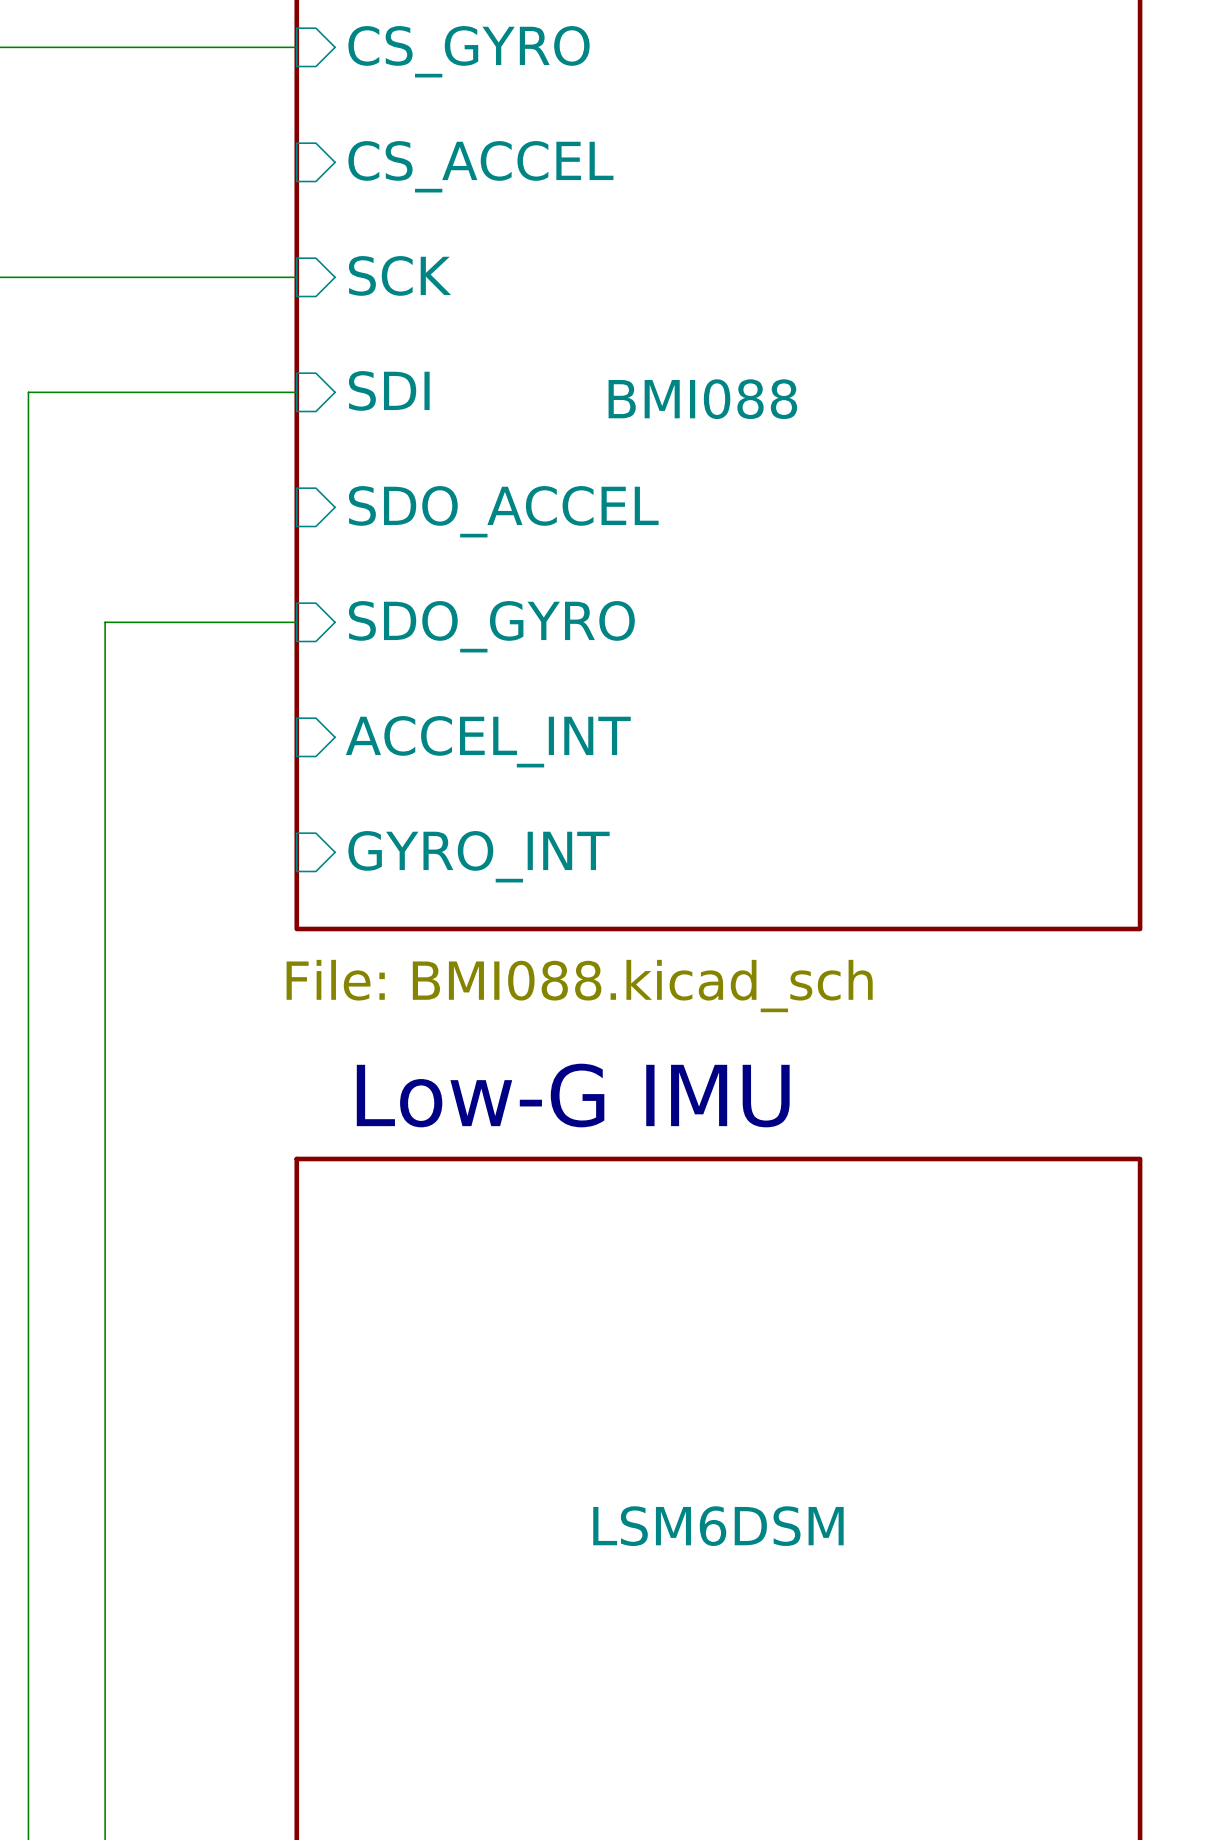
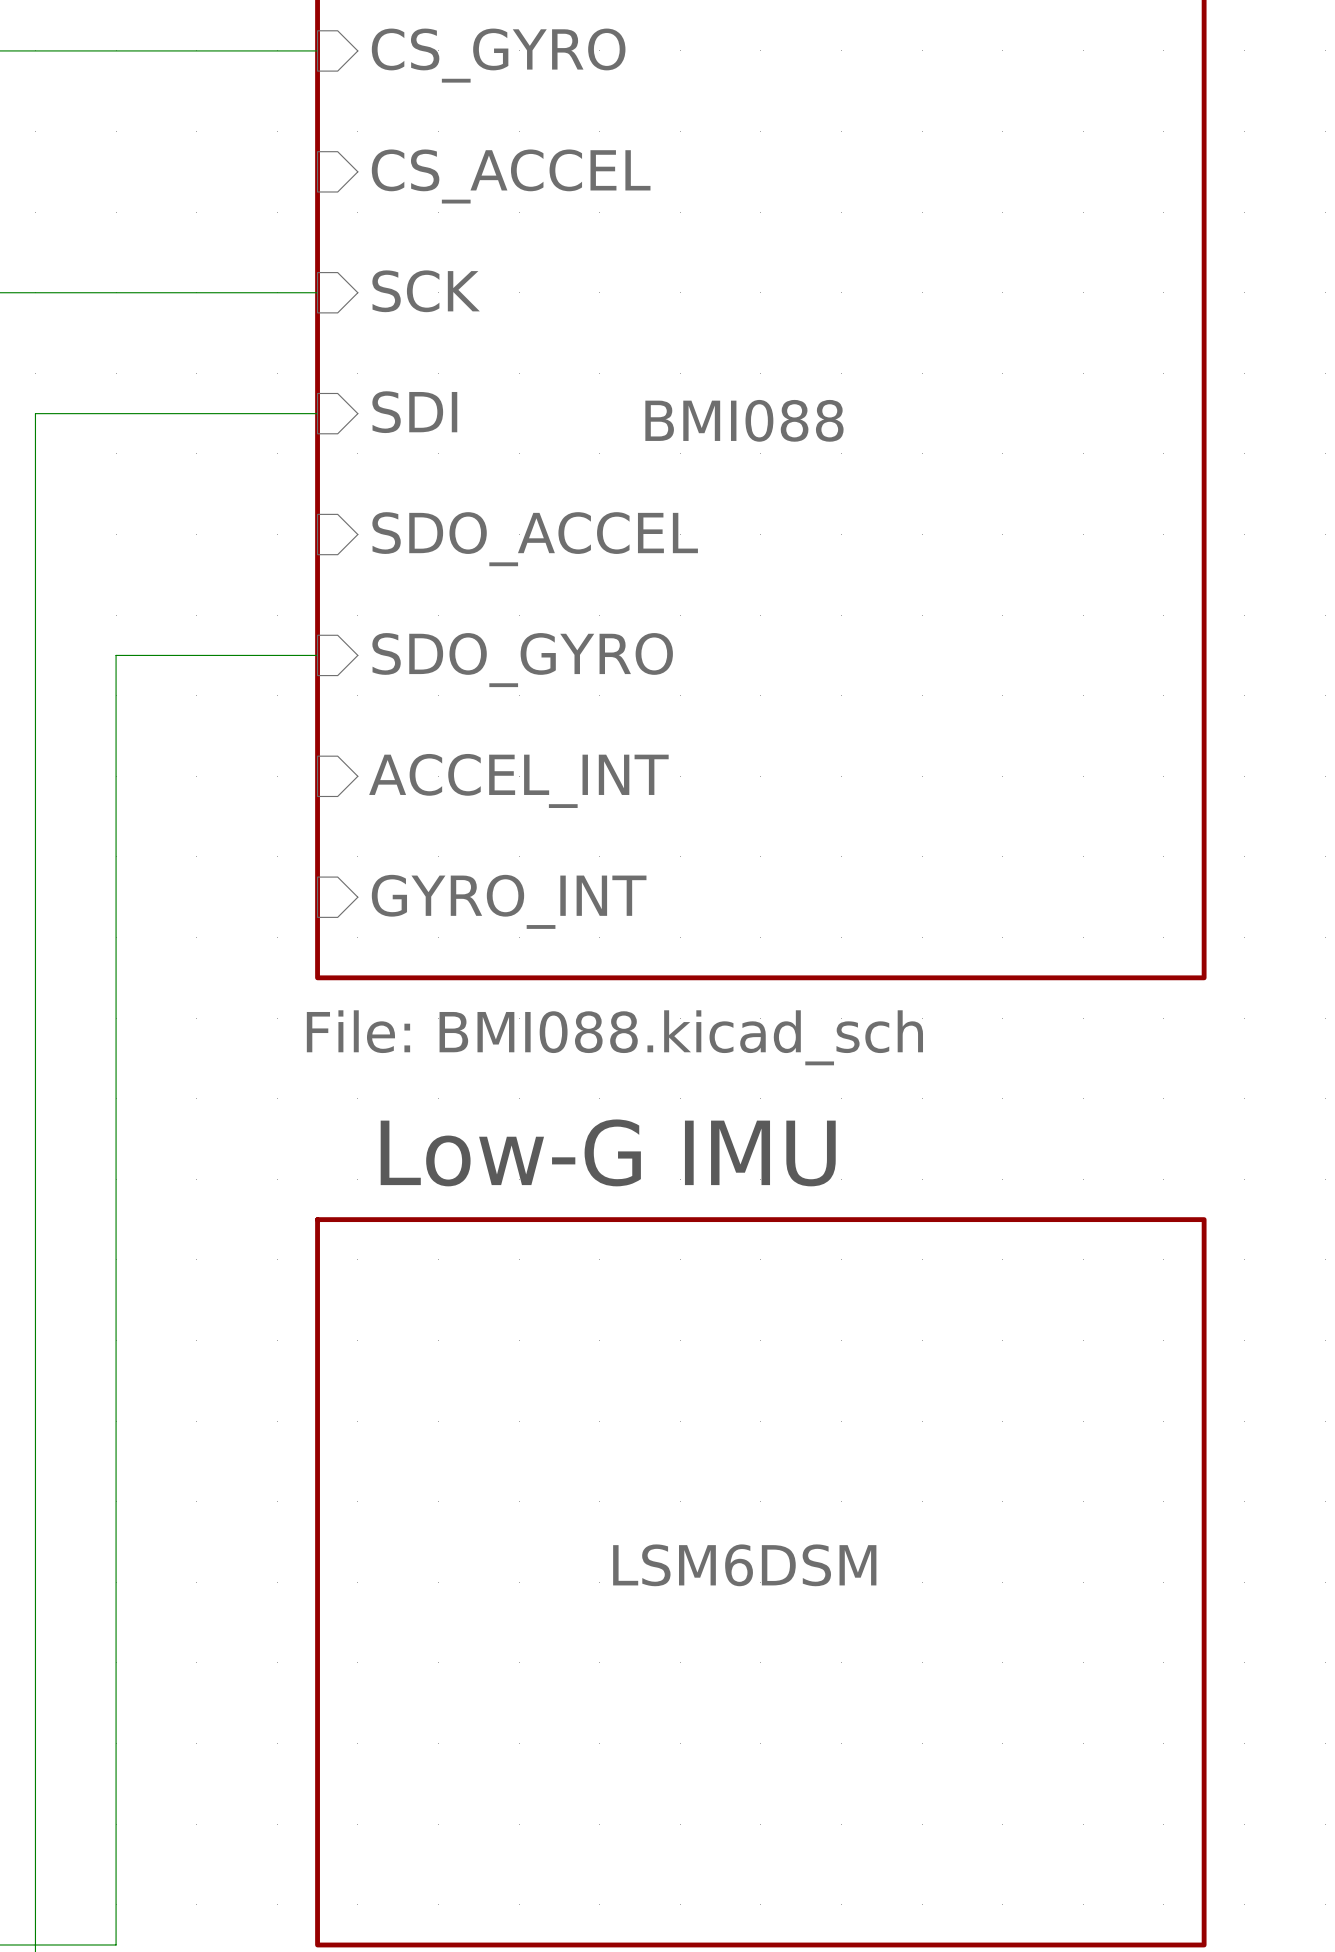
sheet LSM6DSM name position: LSM6DSM (718, 1526) -> LSM6DSM (744, 1565)

